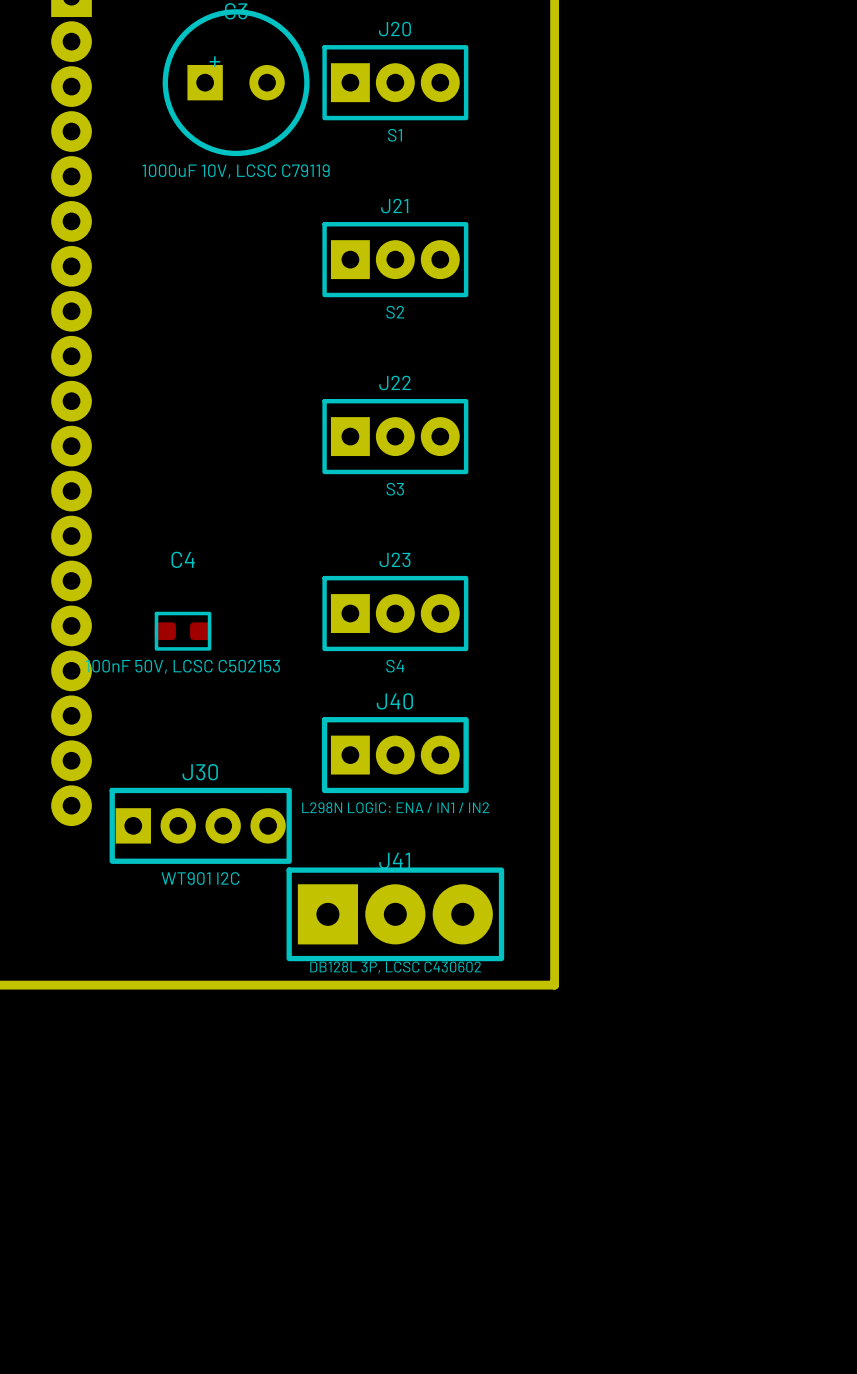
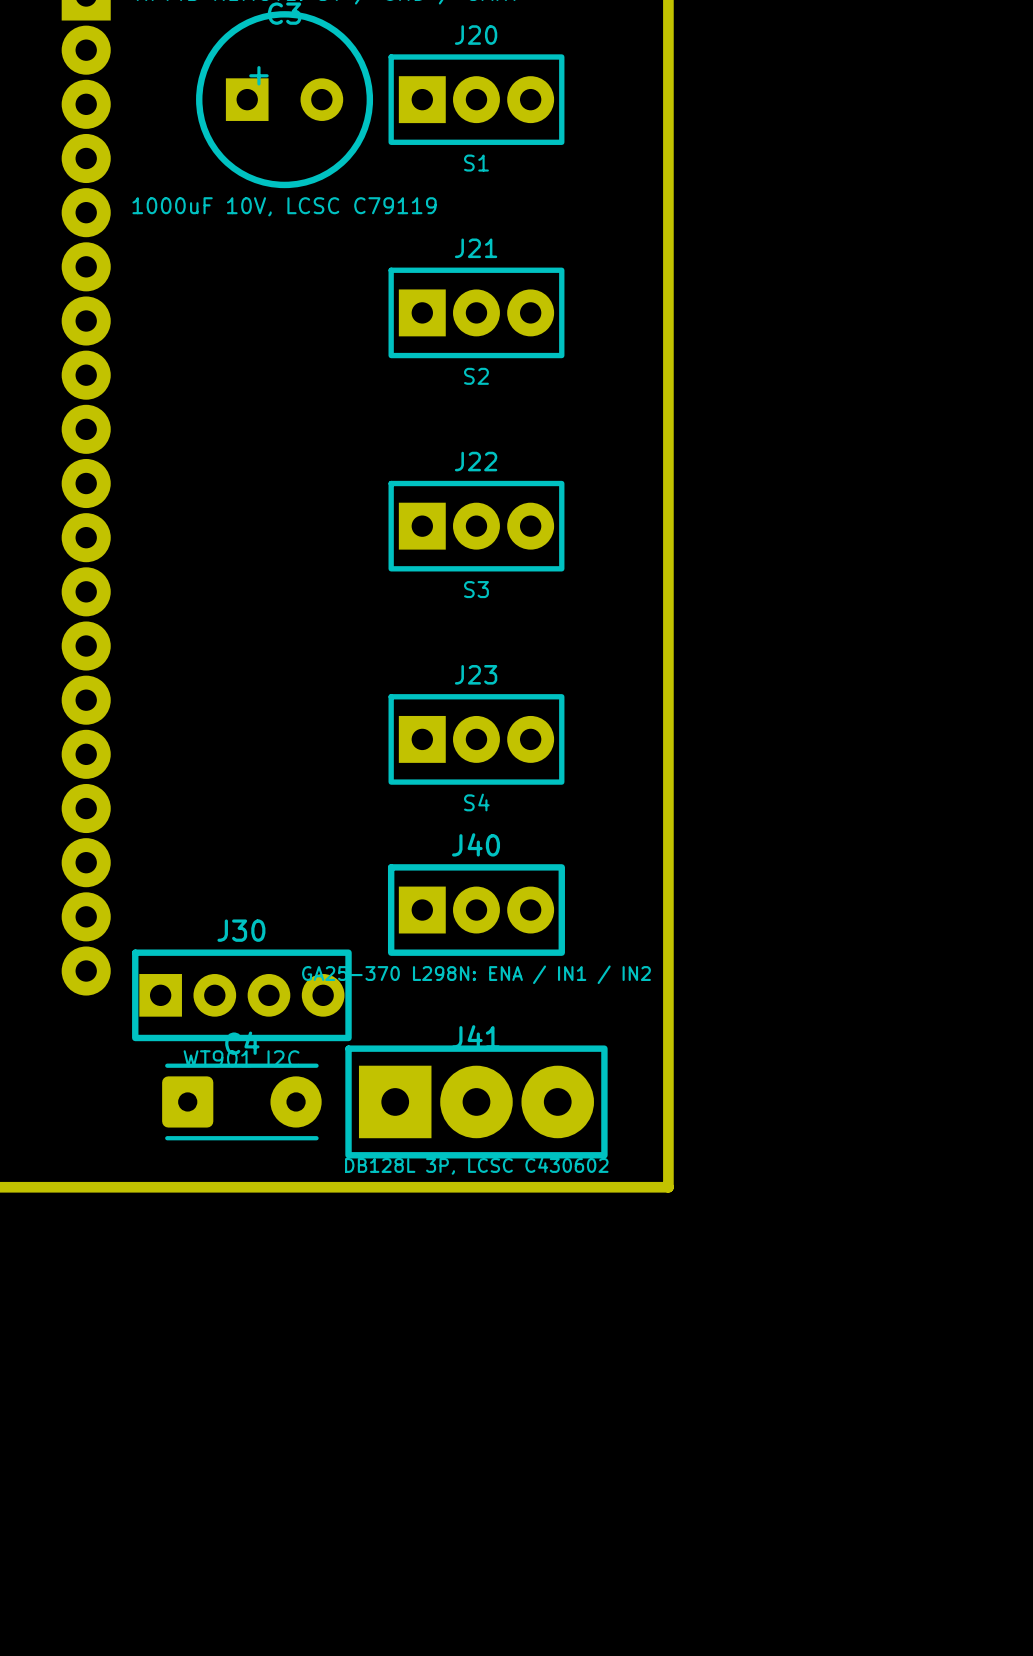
C4 footprint: [154, 611, 212, 651] -> [162, 1063, 322, 1141]
C4 value: 100nF 50V, LCSC C502153 (182, 666) -> none
J40 value: L298N LOGIC: ENA / IN1 / IN2 (395, 807) -> GA25-370 L298N: ENA / IN1 / IN2 (476, 974)

